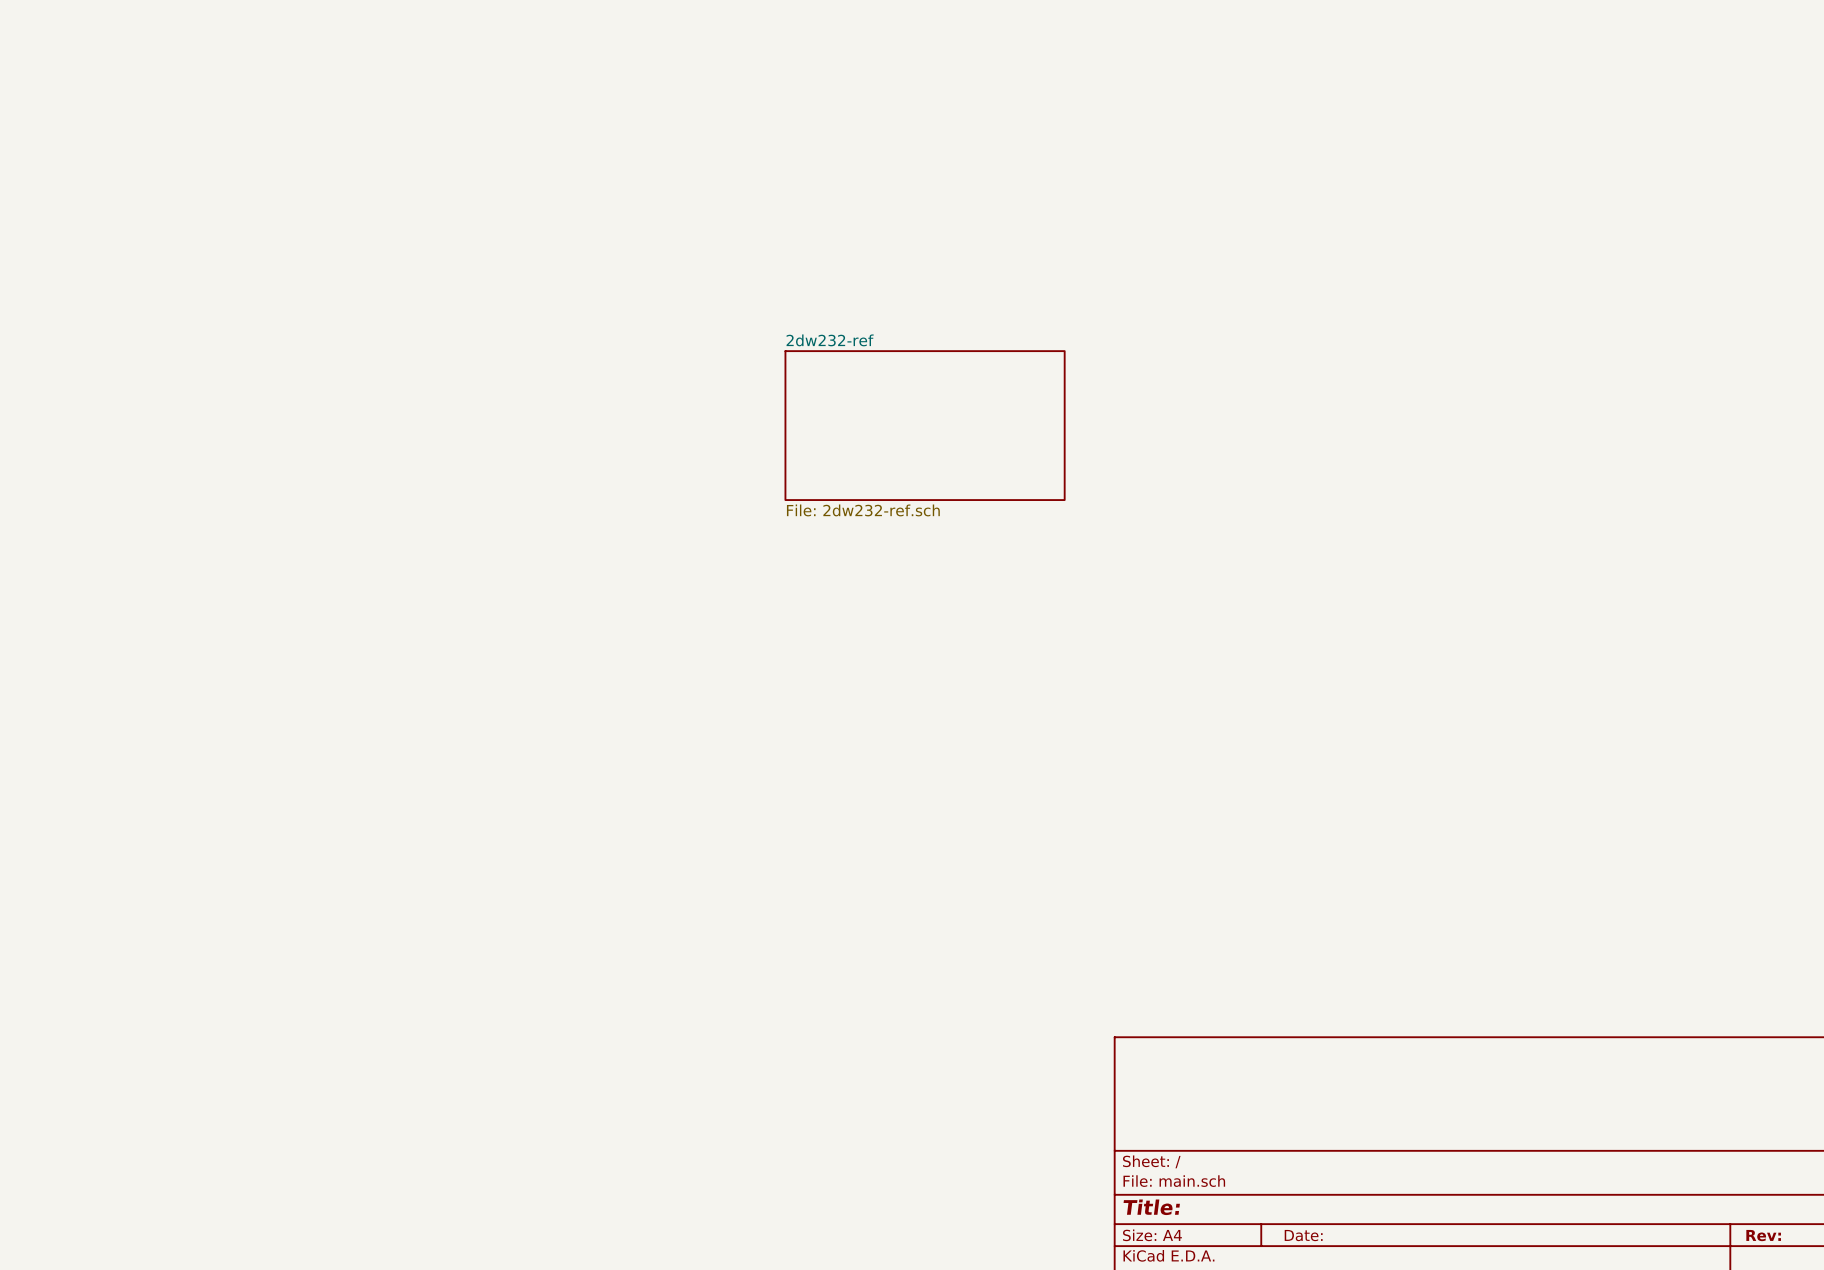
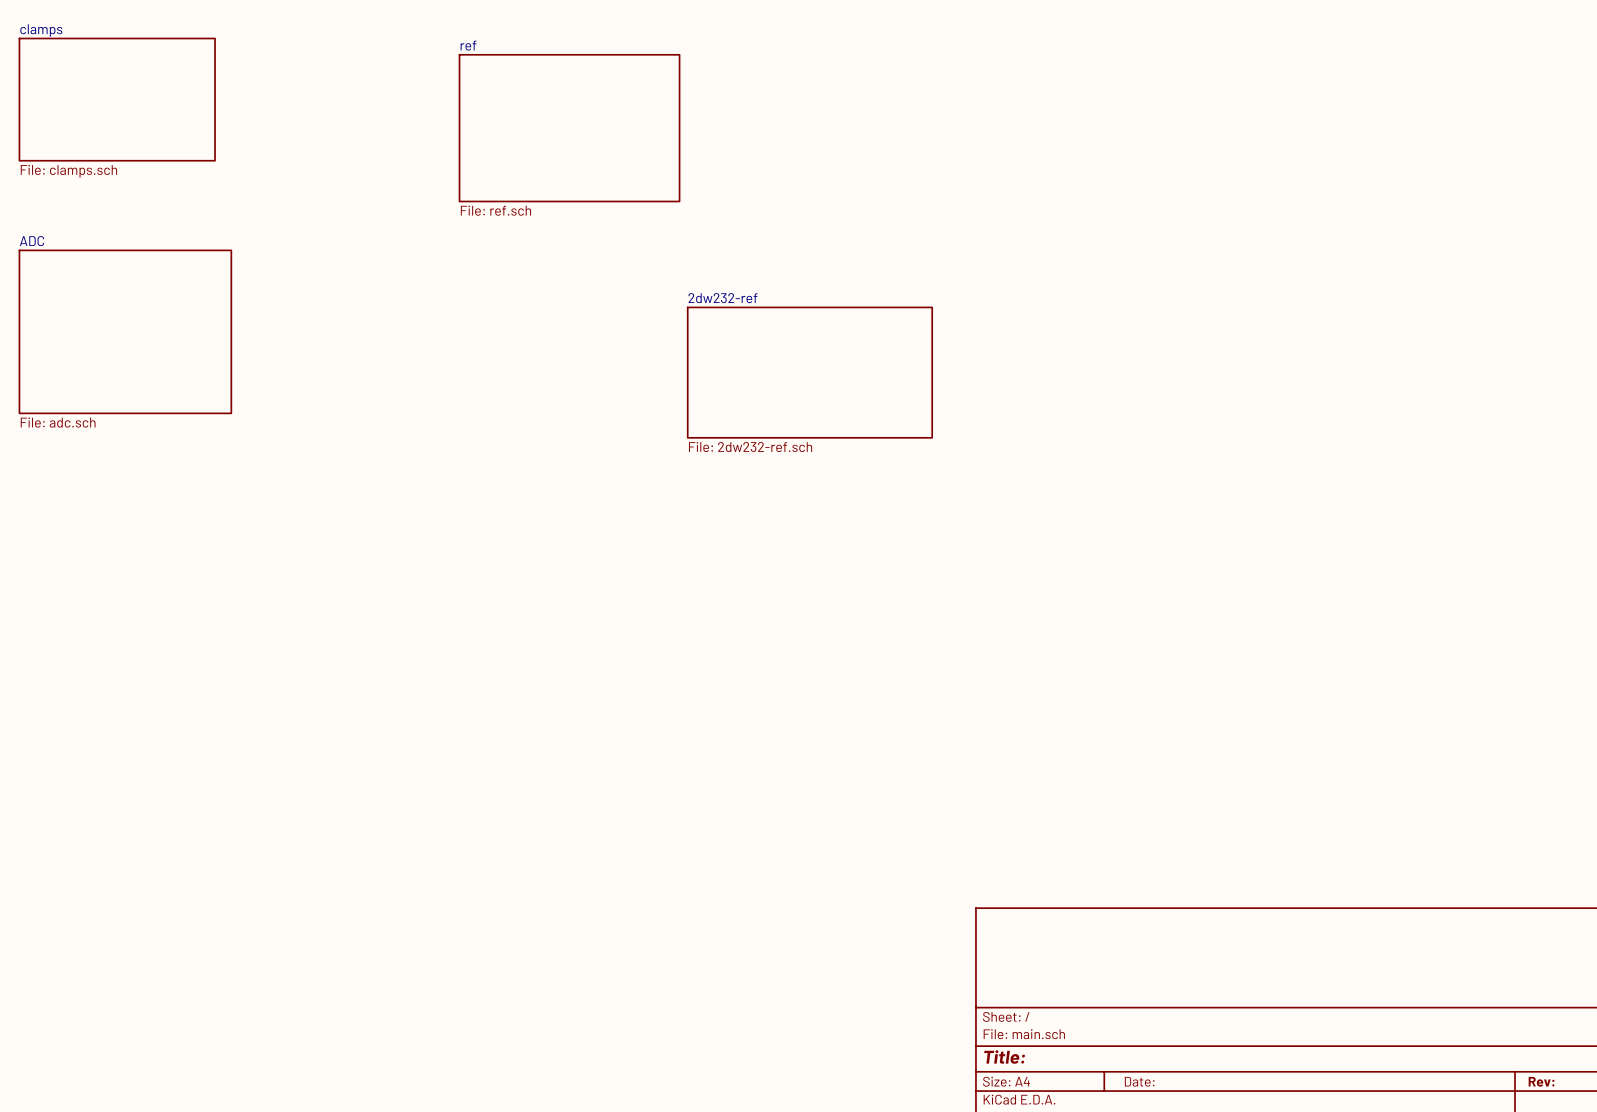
sheet clamps: none -> File: clamps.sch (117, 99)
sheet ref: none -> File: ref.sch (569, 128)
sheet ADC: none -> File: adc.sch (125, 331)

